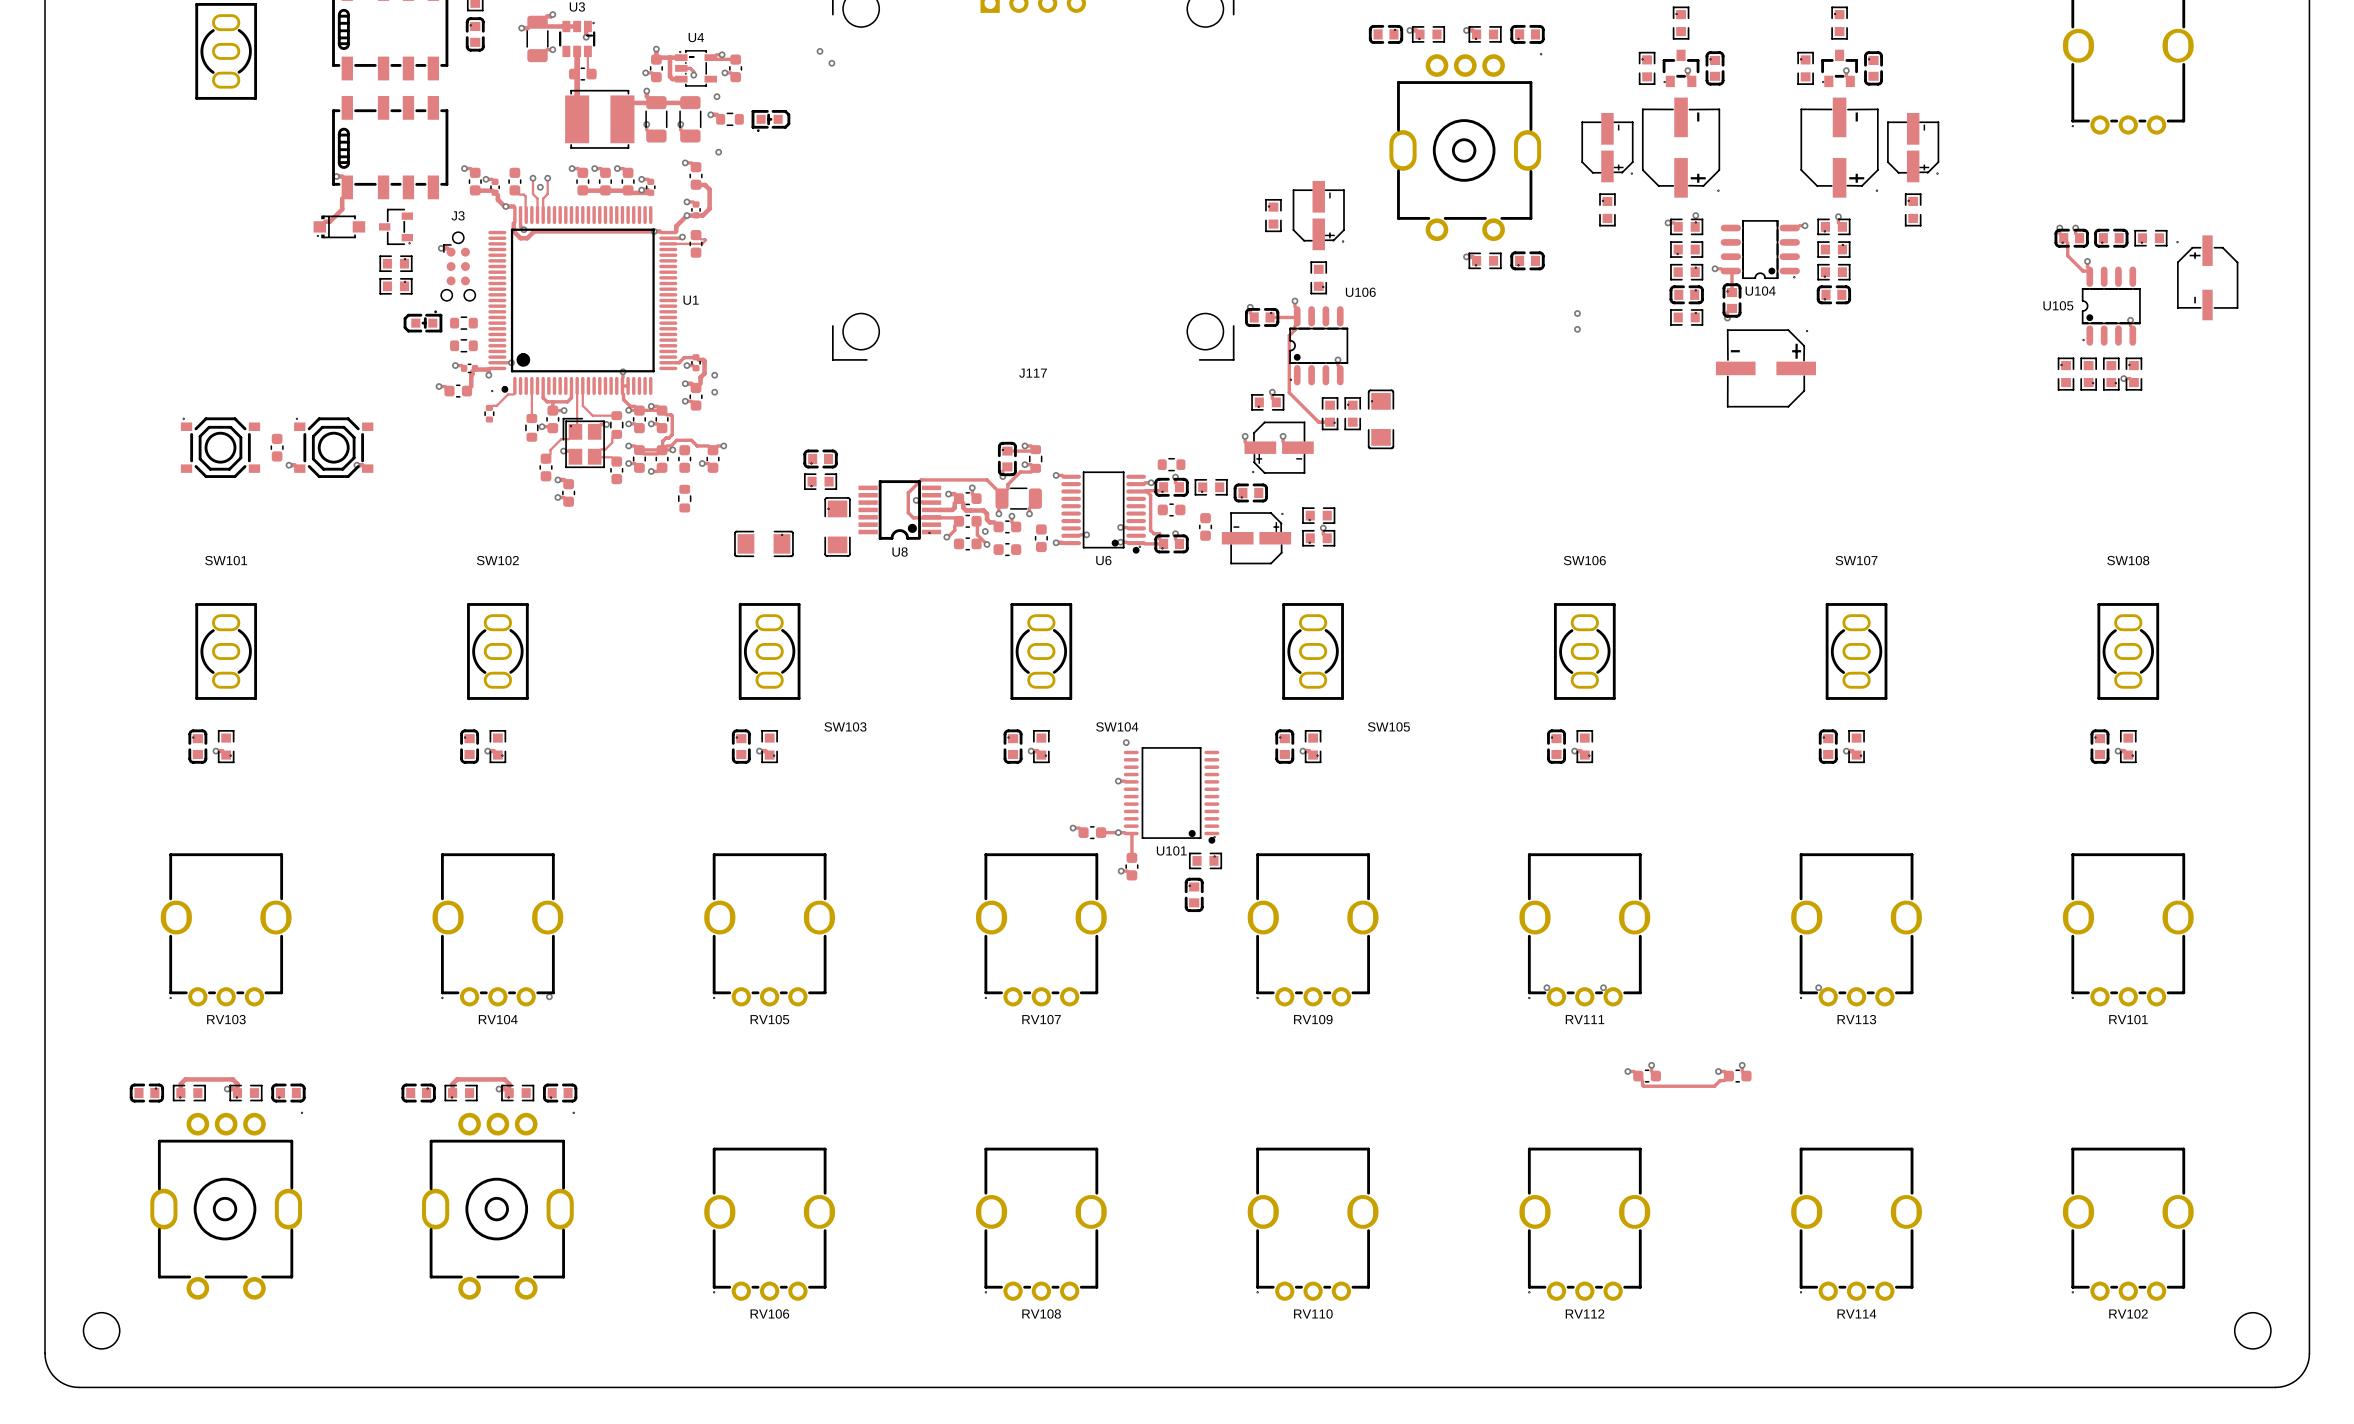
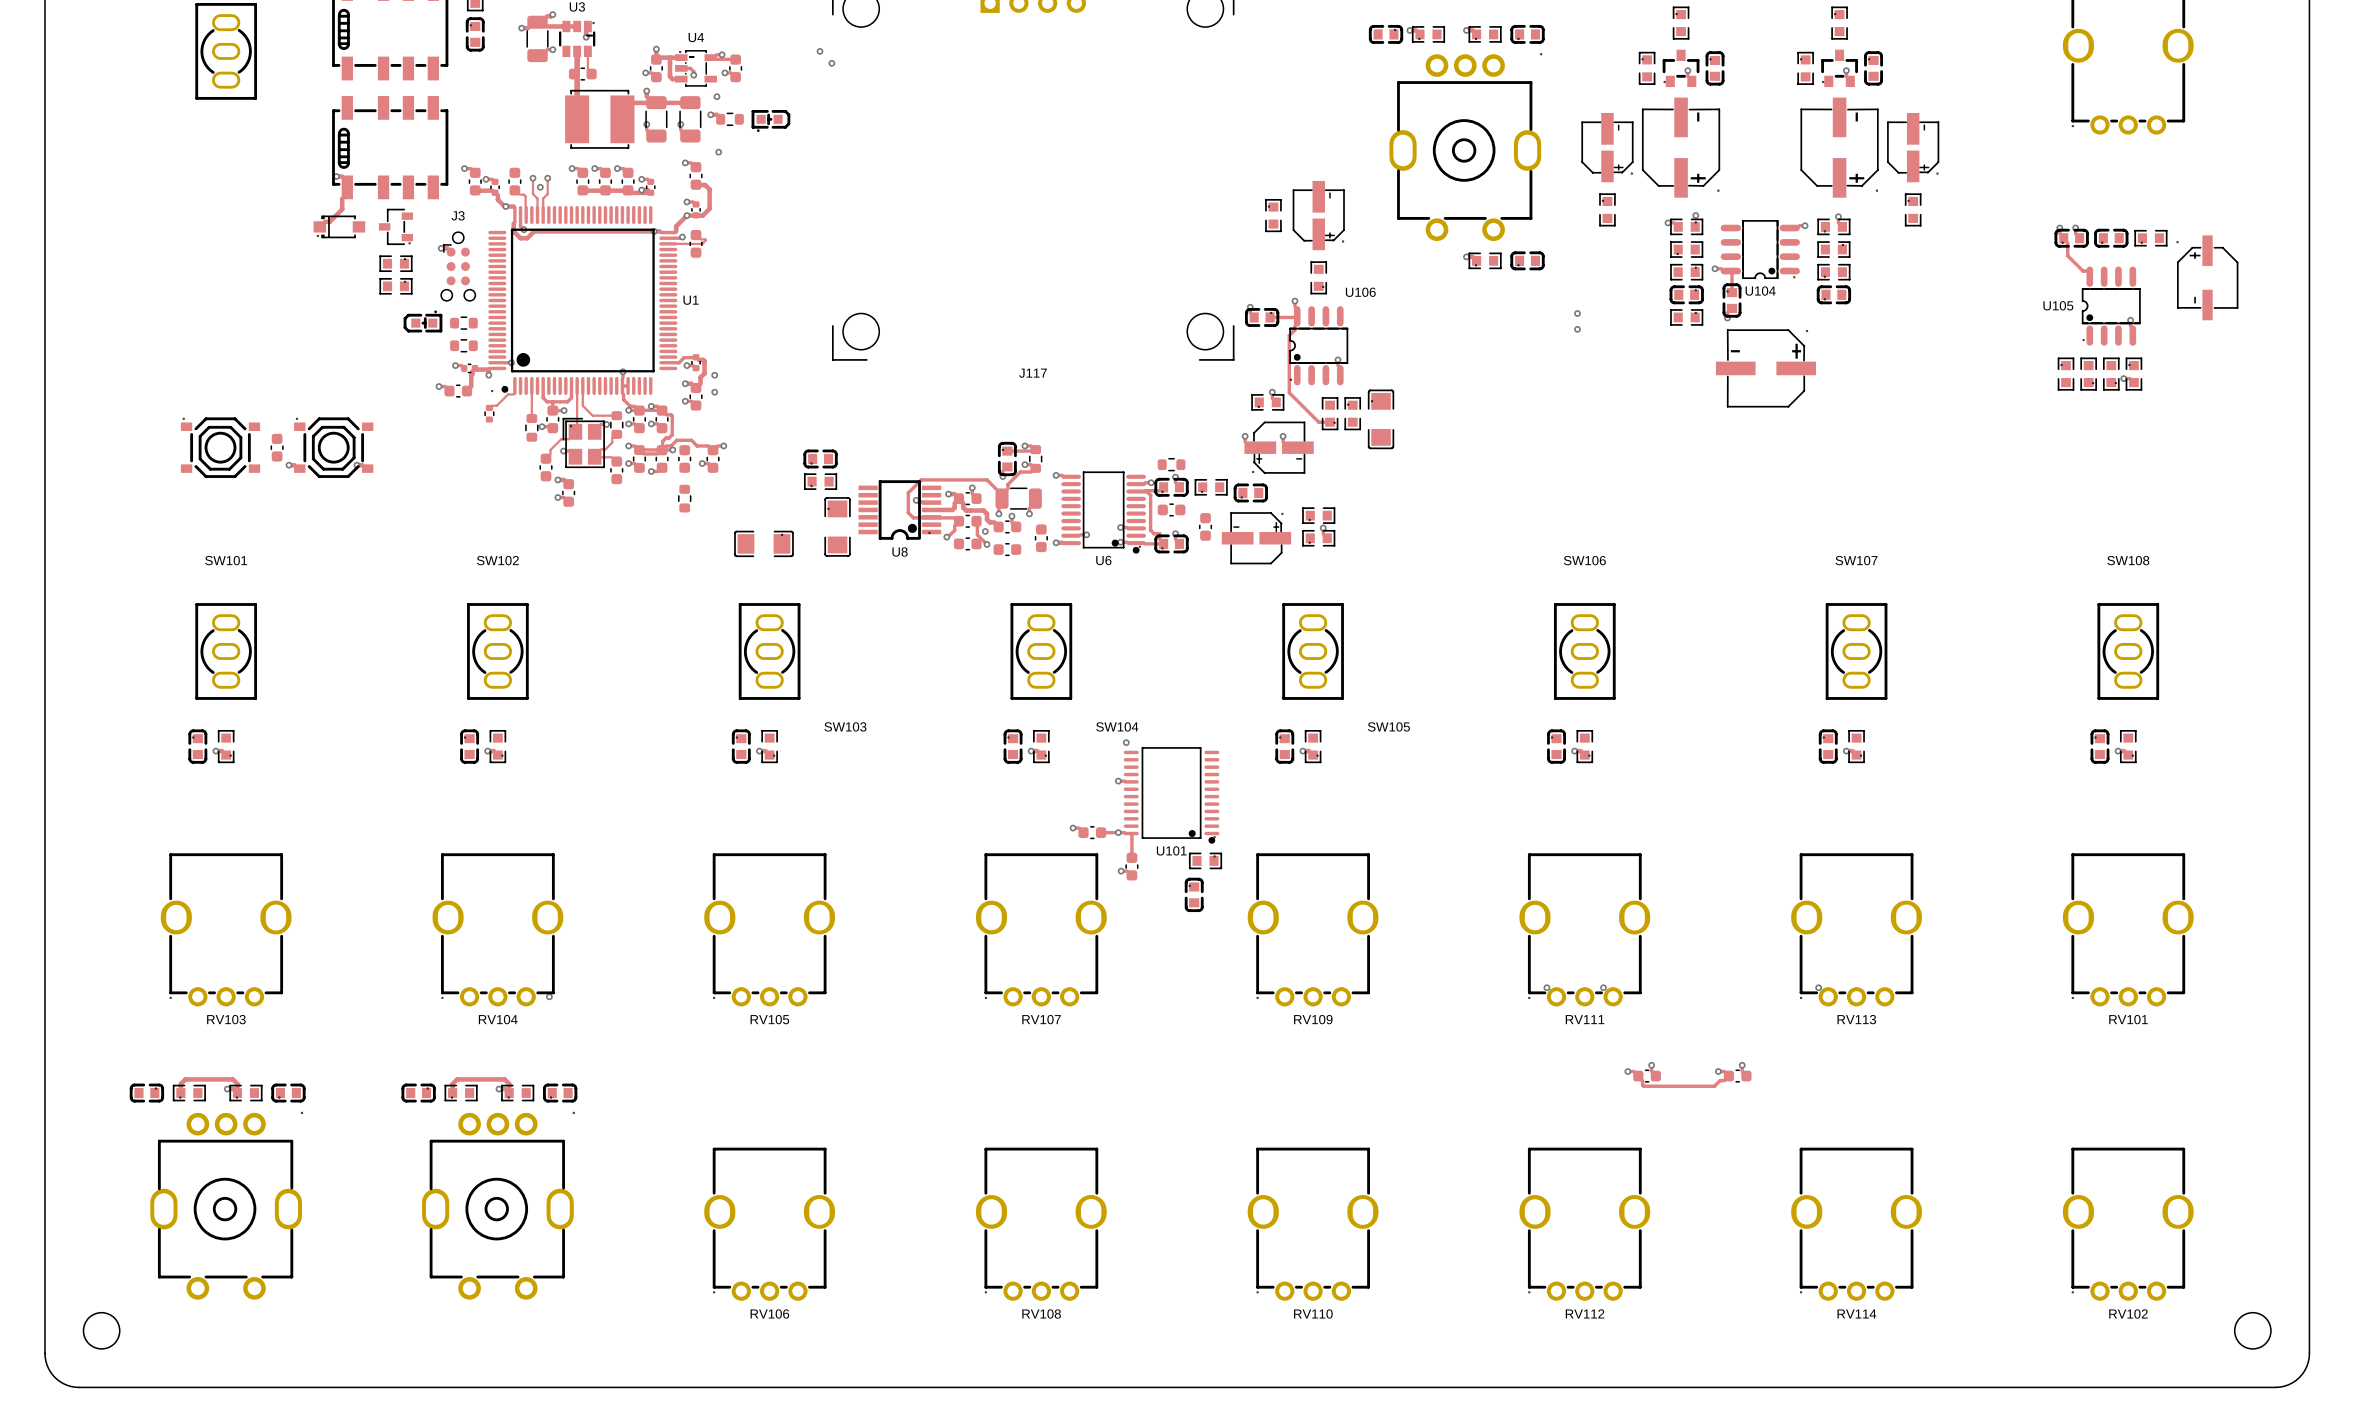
track: (2087, 261) (2087, 267) -> none
via: (2087, 261) -> none

